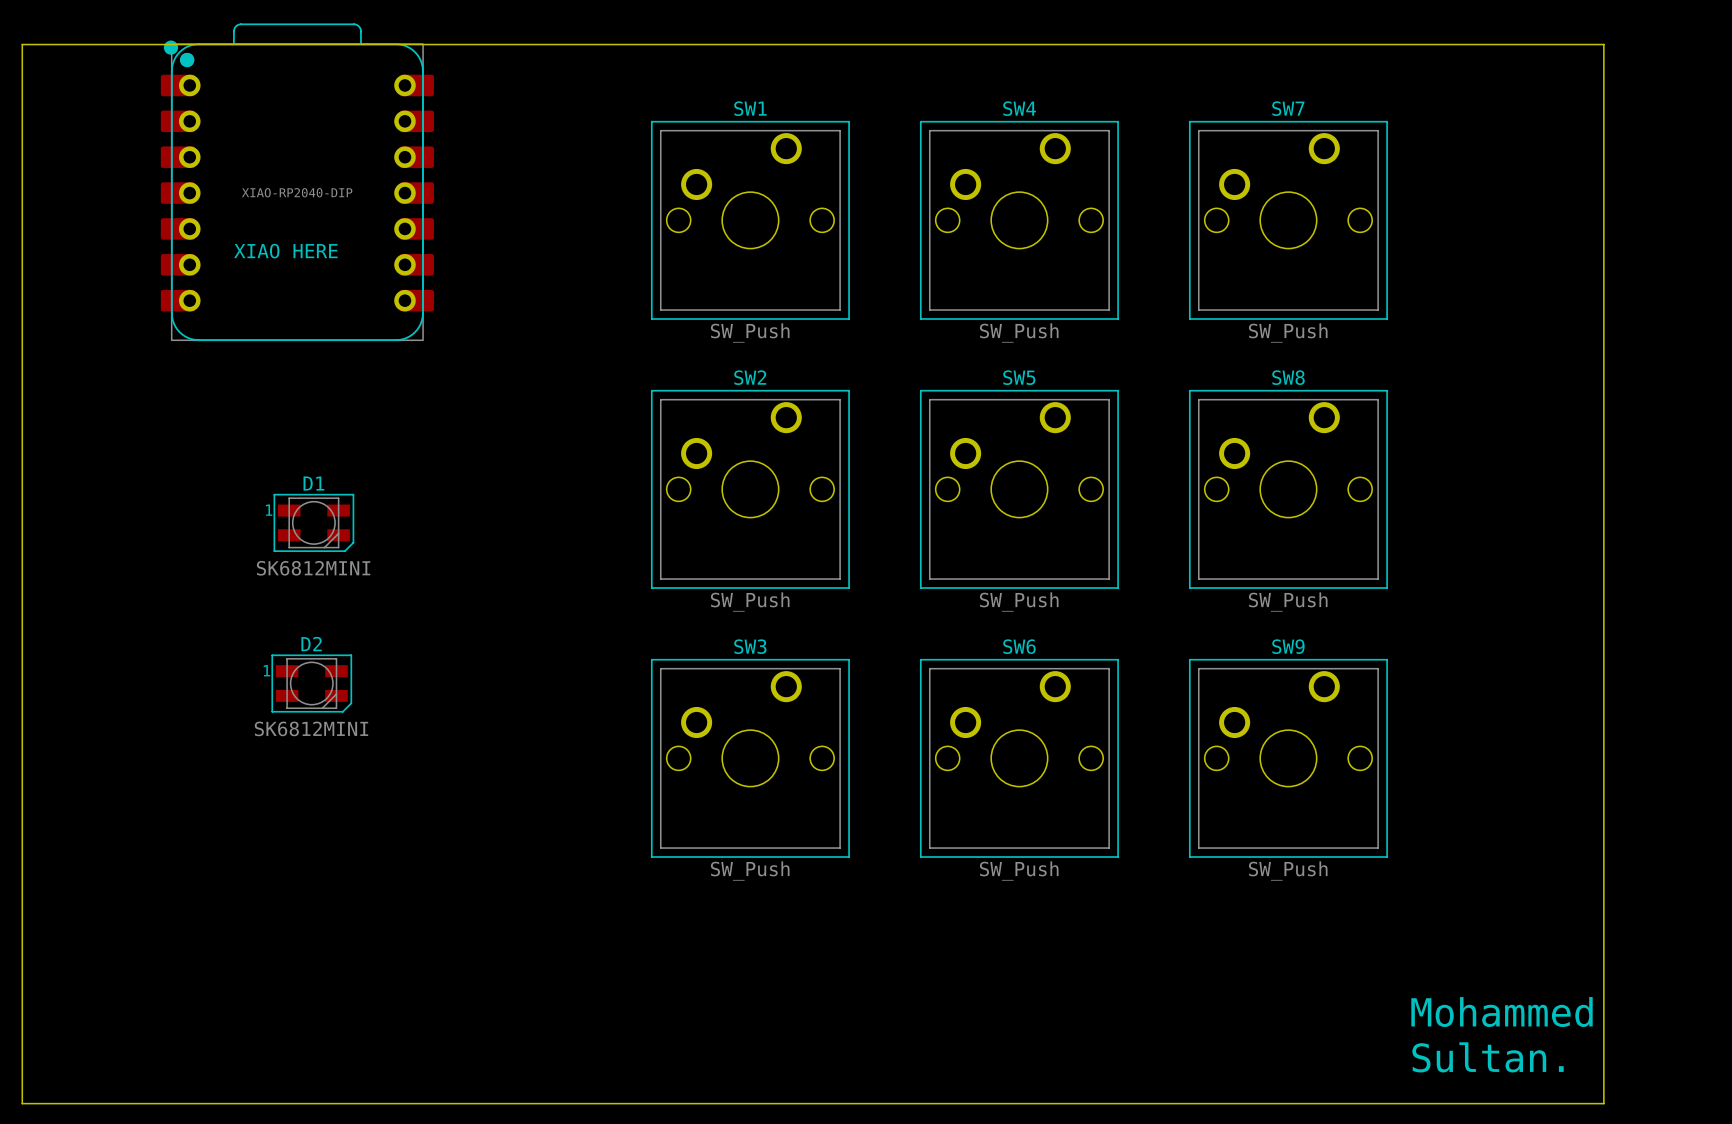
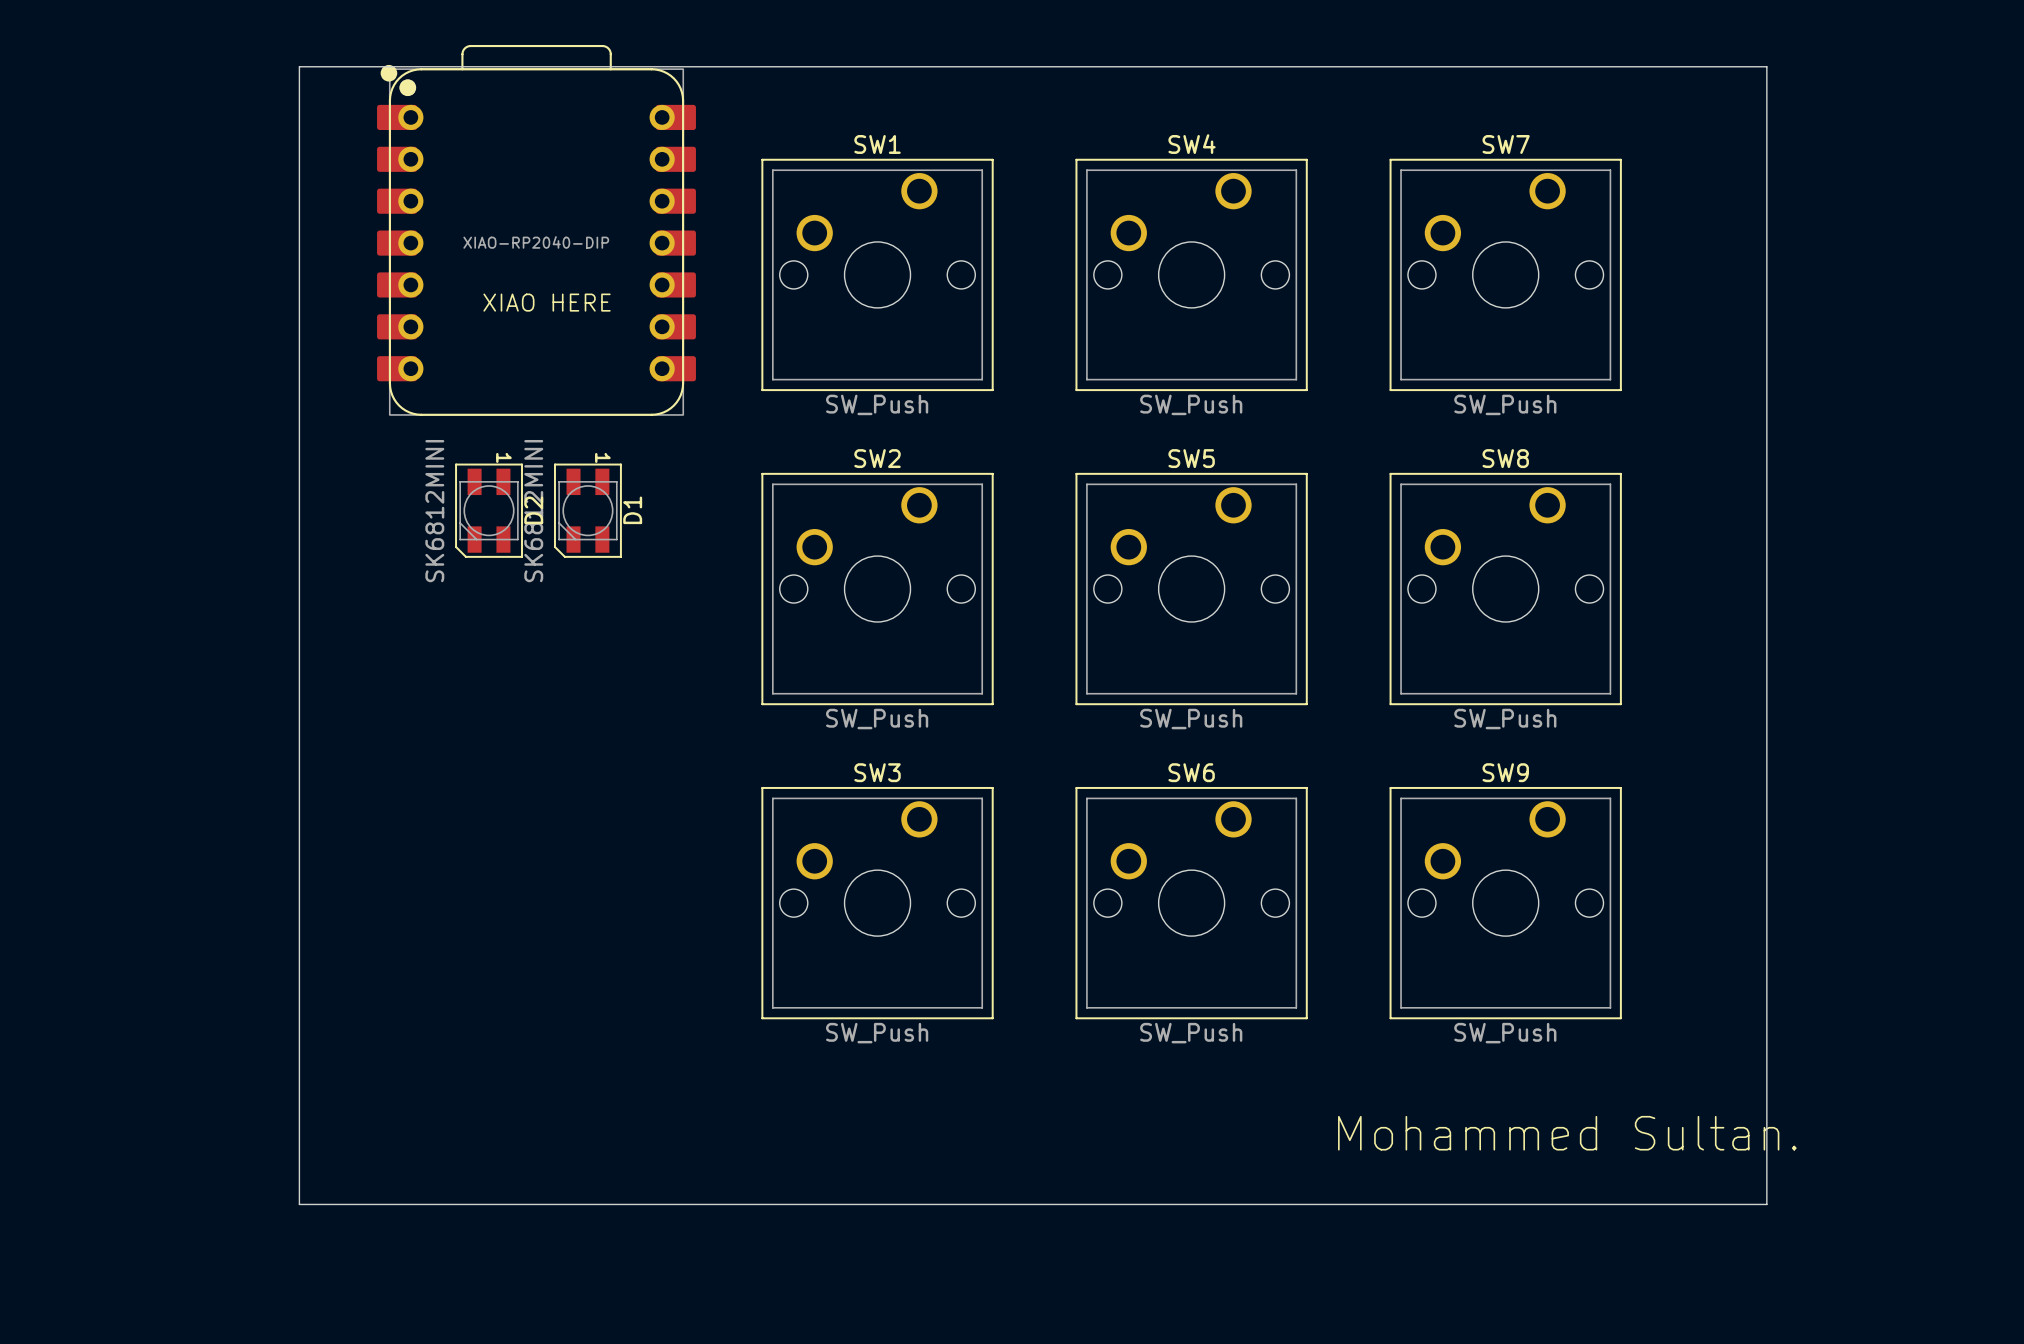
board edge: (22, 44) (1603, 44) (1603, 1103) (22, 1103) (22, 44) -> (299, 66) (299, 1204) (1766, 1204) (1766, 66) (299, 66)
part position: (297, 182) -> (536, 230)
text position: XIAO HERE (285, 251) -> XIAO HERE (547, 302)
D1 rotation: 0° (313, 522) -> 90° clockwise (587, 510)
D1 position: (313, 522) -> (587, 510)
D2 rotation: 0° (311, 683) -> 90° clockwise (489, 510)
D2 position: (311, 683) -> (489, 510)
text: Mohammed (1502, 1012) -> Mohammed Sultan. (1567, 1133)
text: Sultan. (1487, 1057) -> none

